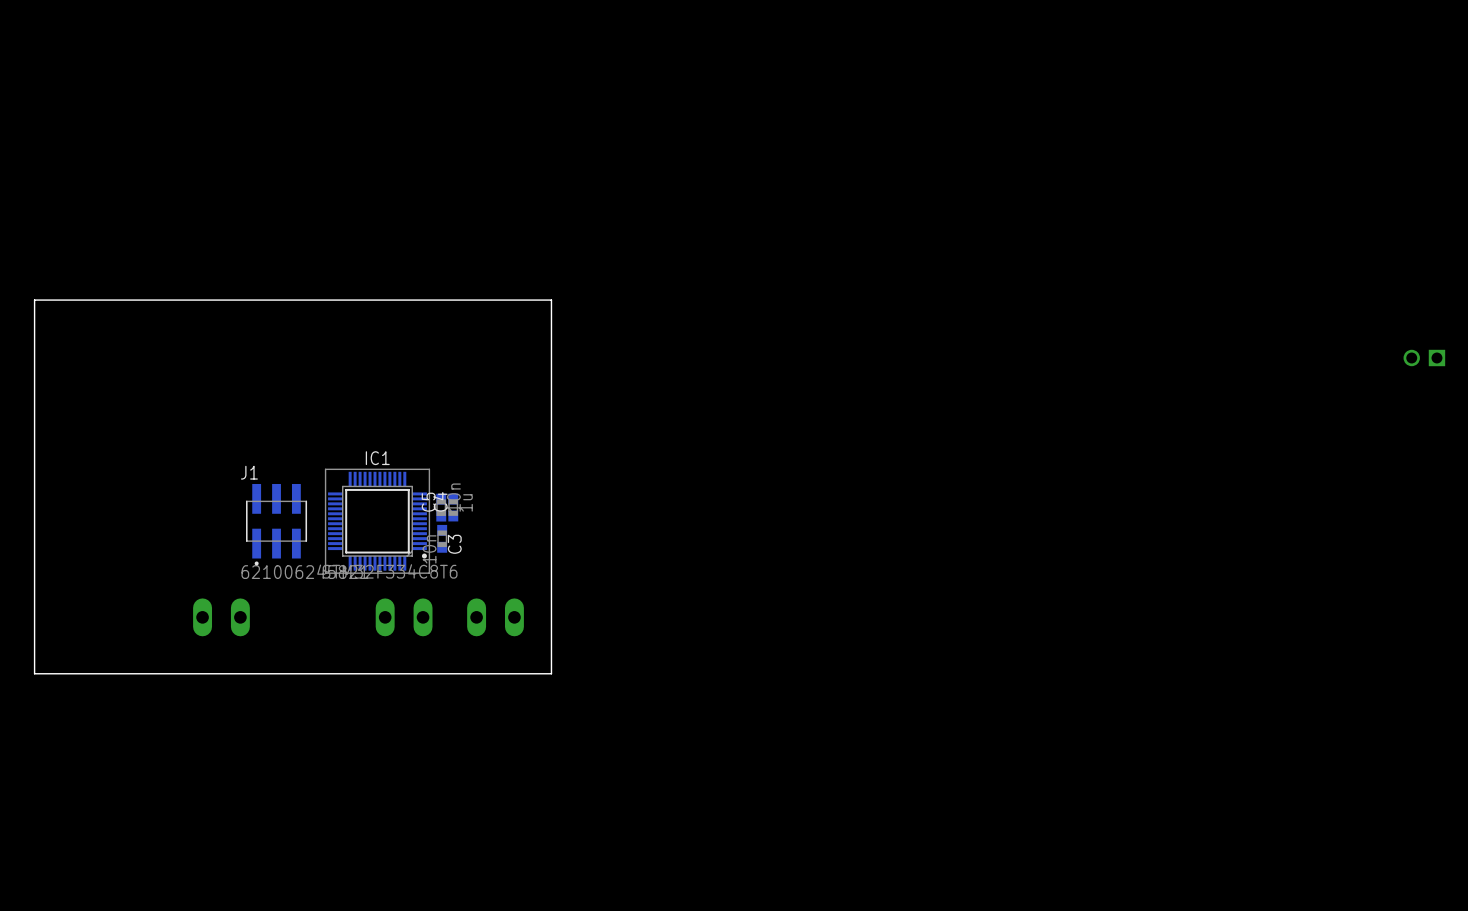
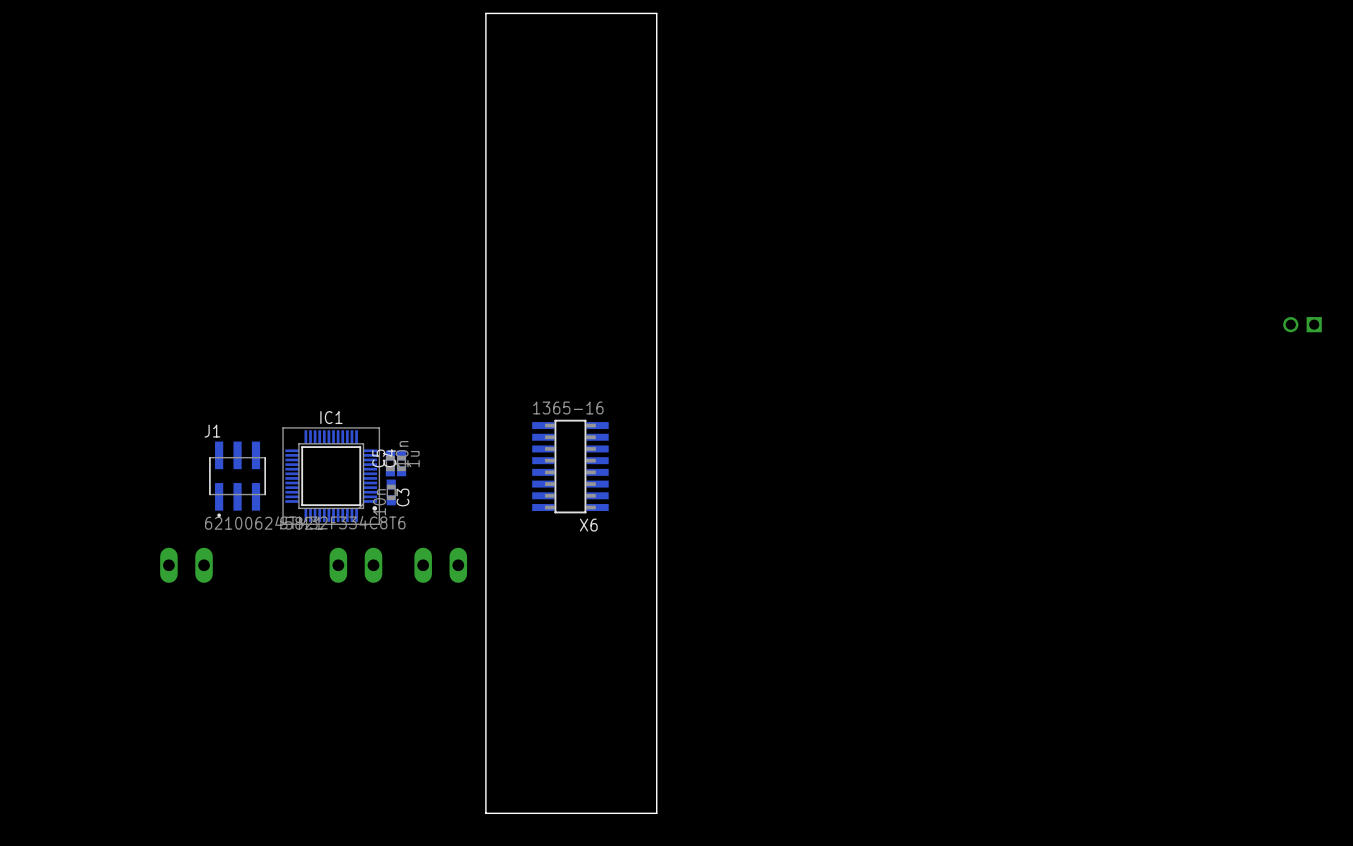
board edge: none -> (656, 13) (485, 13) (485, 813) (656, 813) (656, 13)
board edge: (551, 300) (34, 300) (34, 673) (551, 673) (551, 300) -> none
X6: none -> 1365-16 (570, 466)

